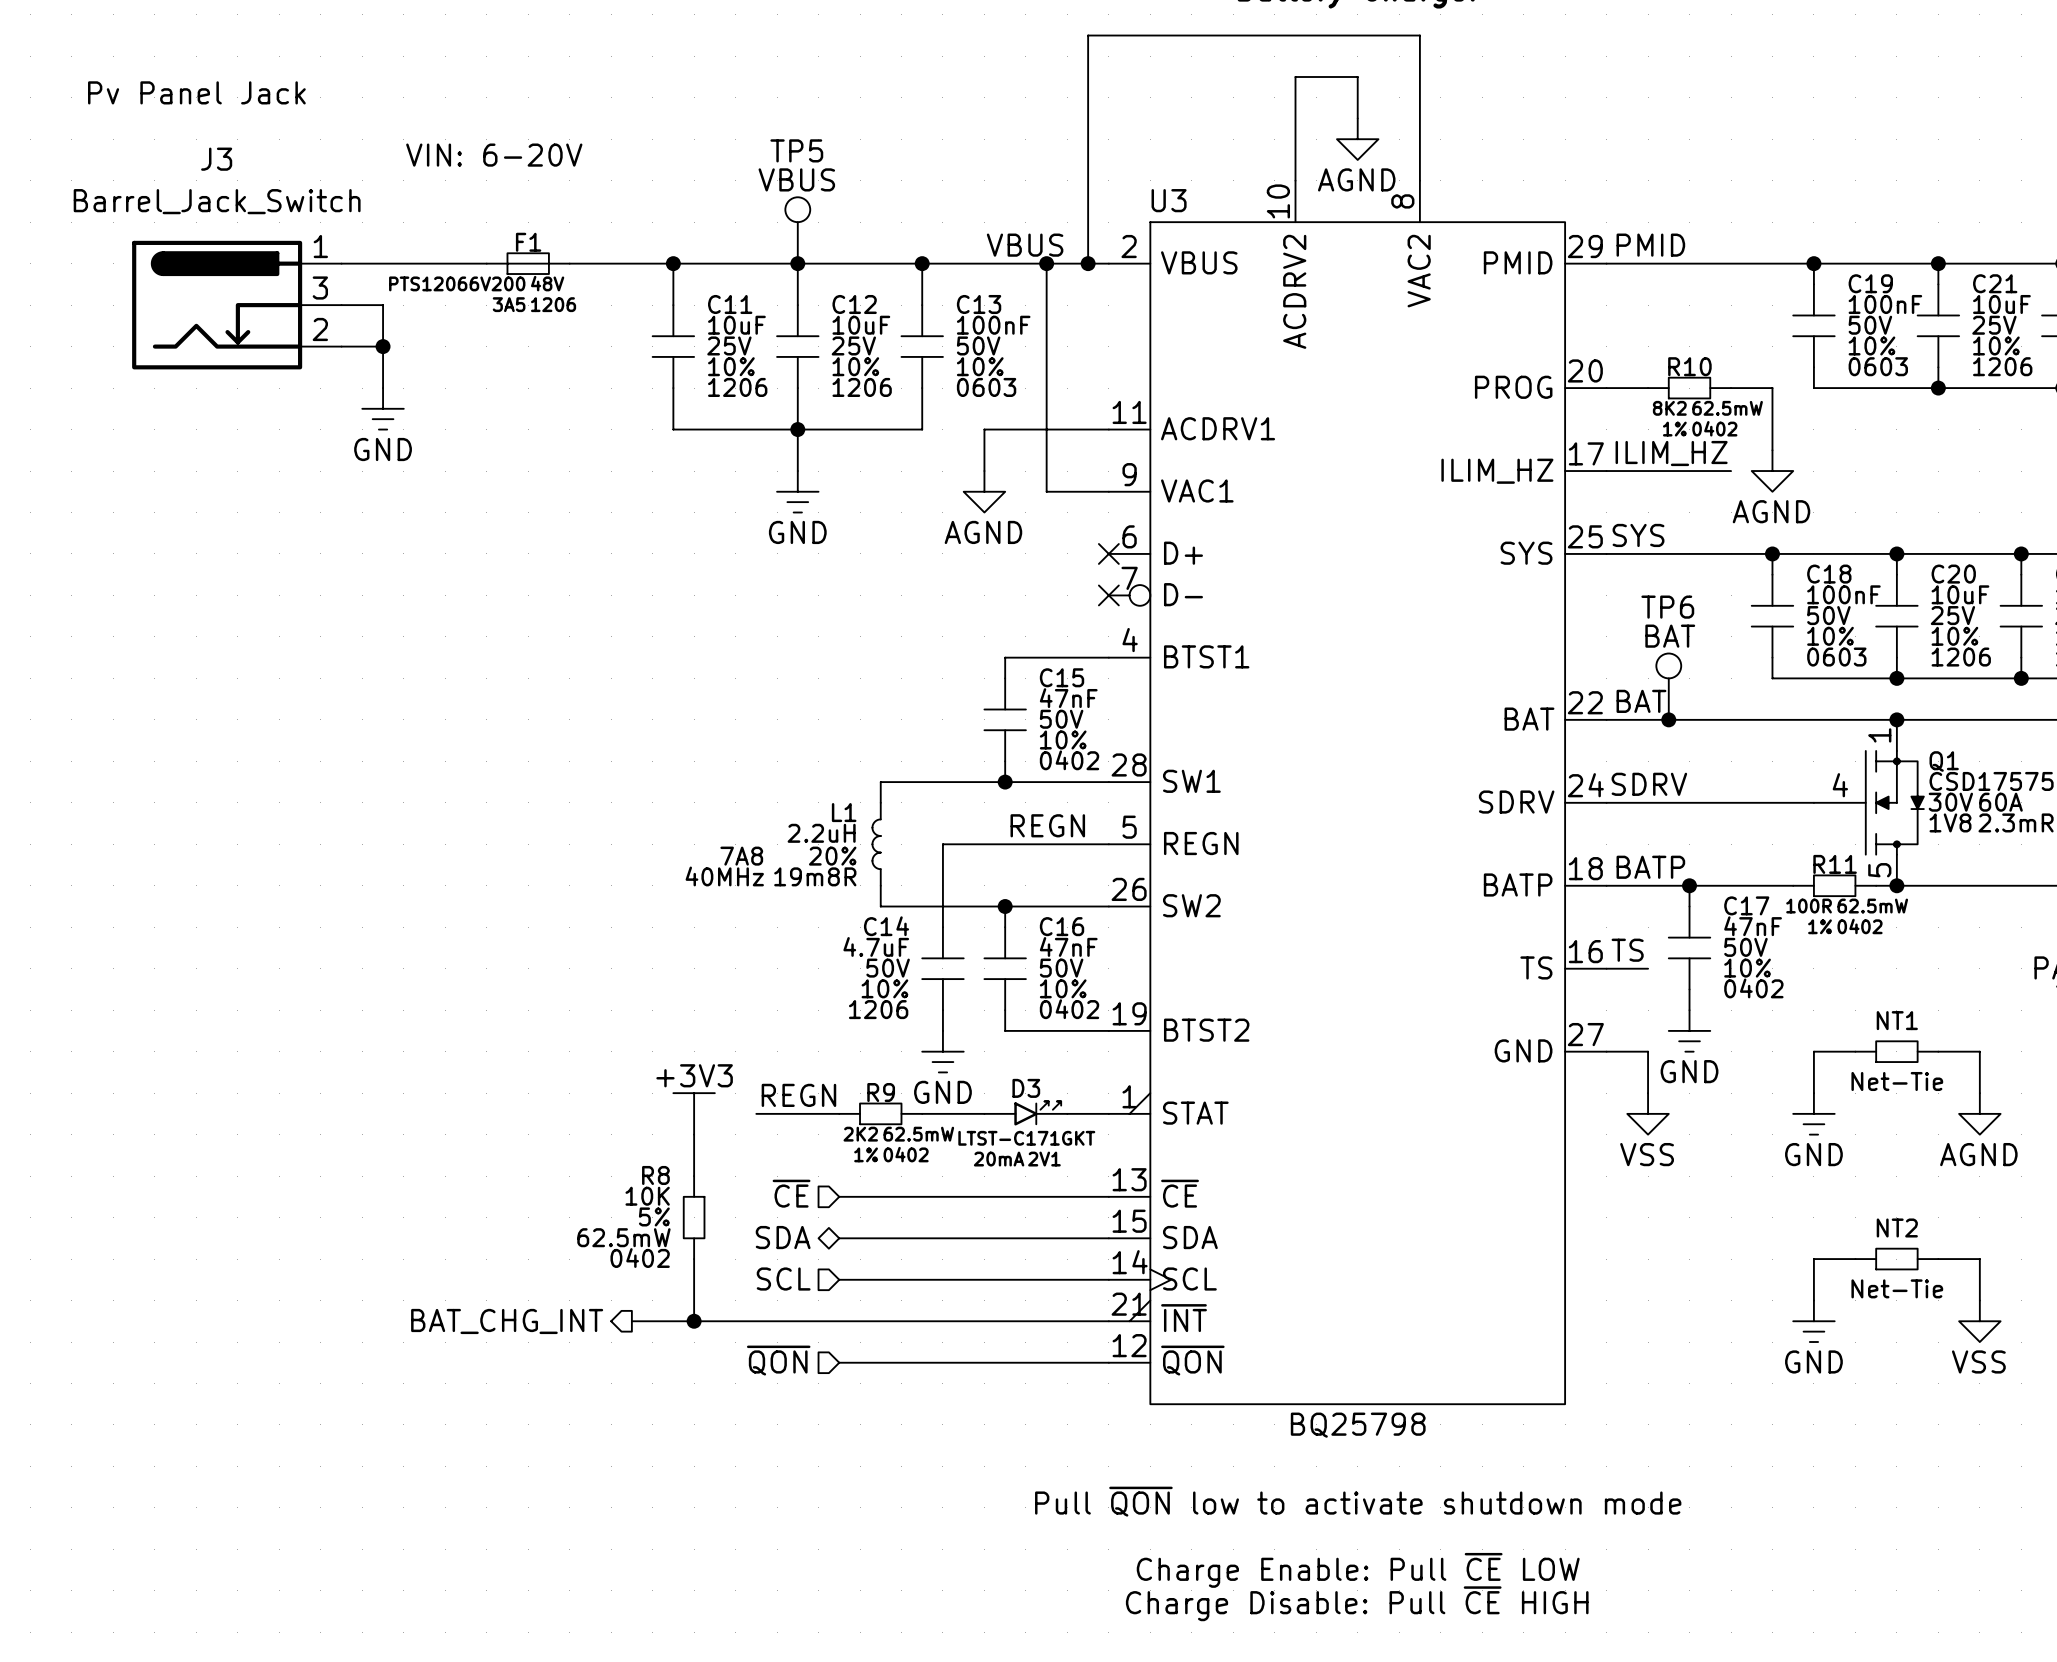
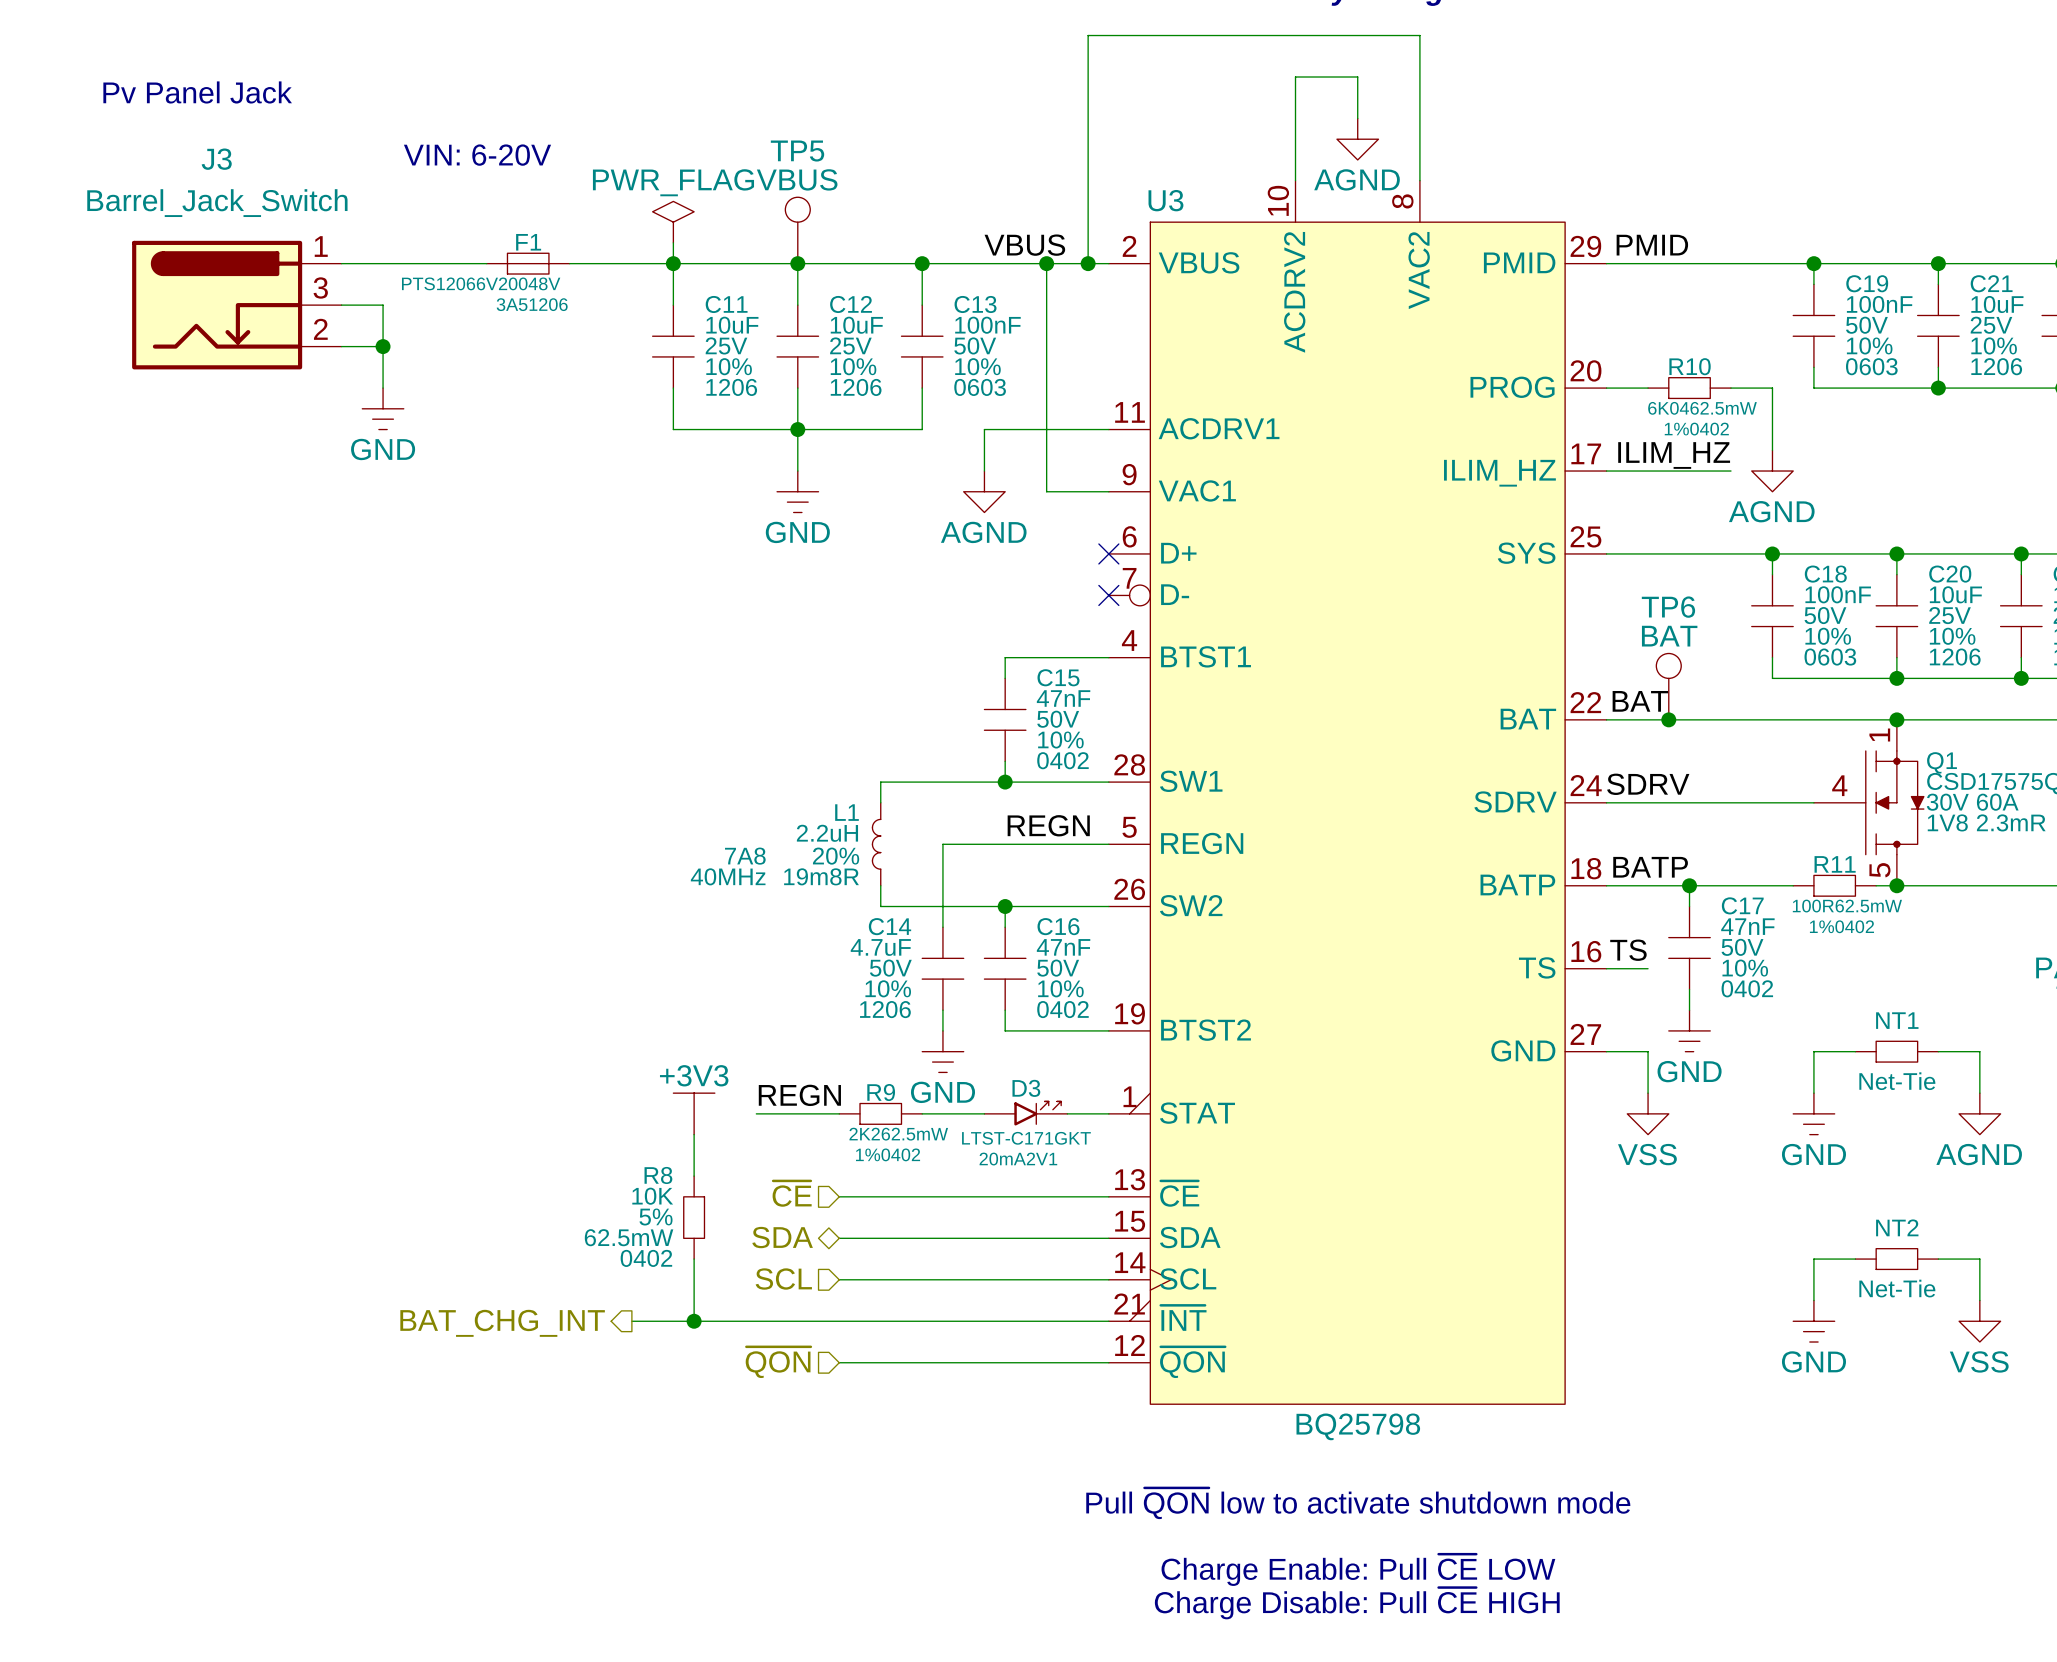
power symbol: none -> PWR_FLAG (673, 222)
wire: none -> (673, 242) (673, 263)
R10 value: 8K2 (1669, 408) -> 6K04 (1668, 408)
label: SYS (1638, 535) -> none

